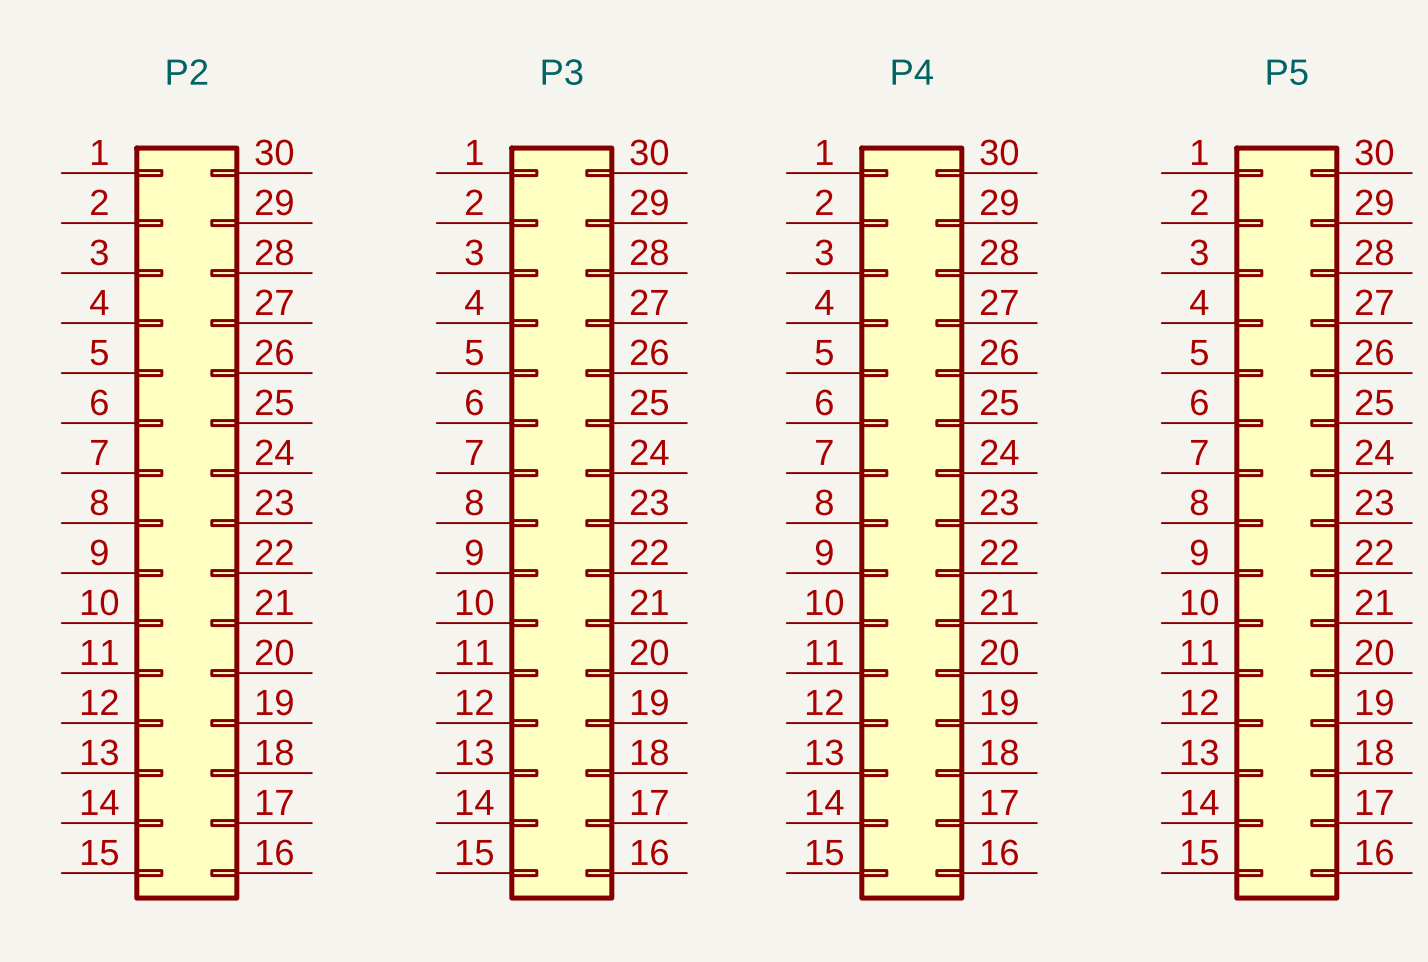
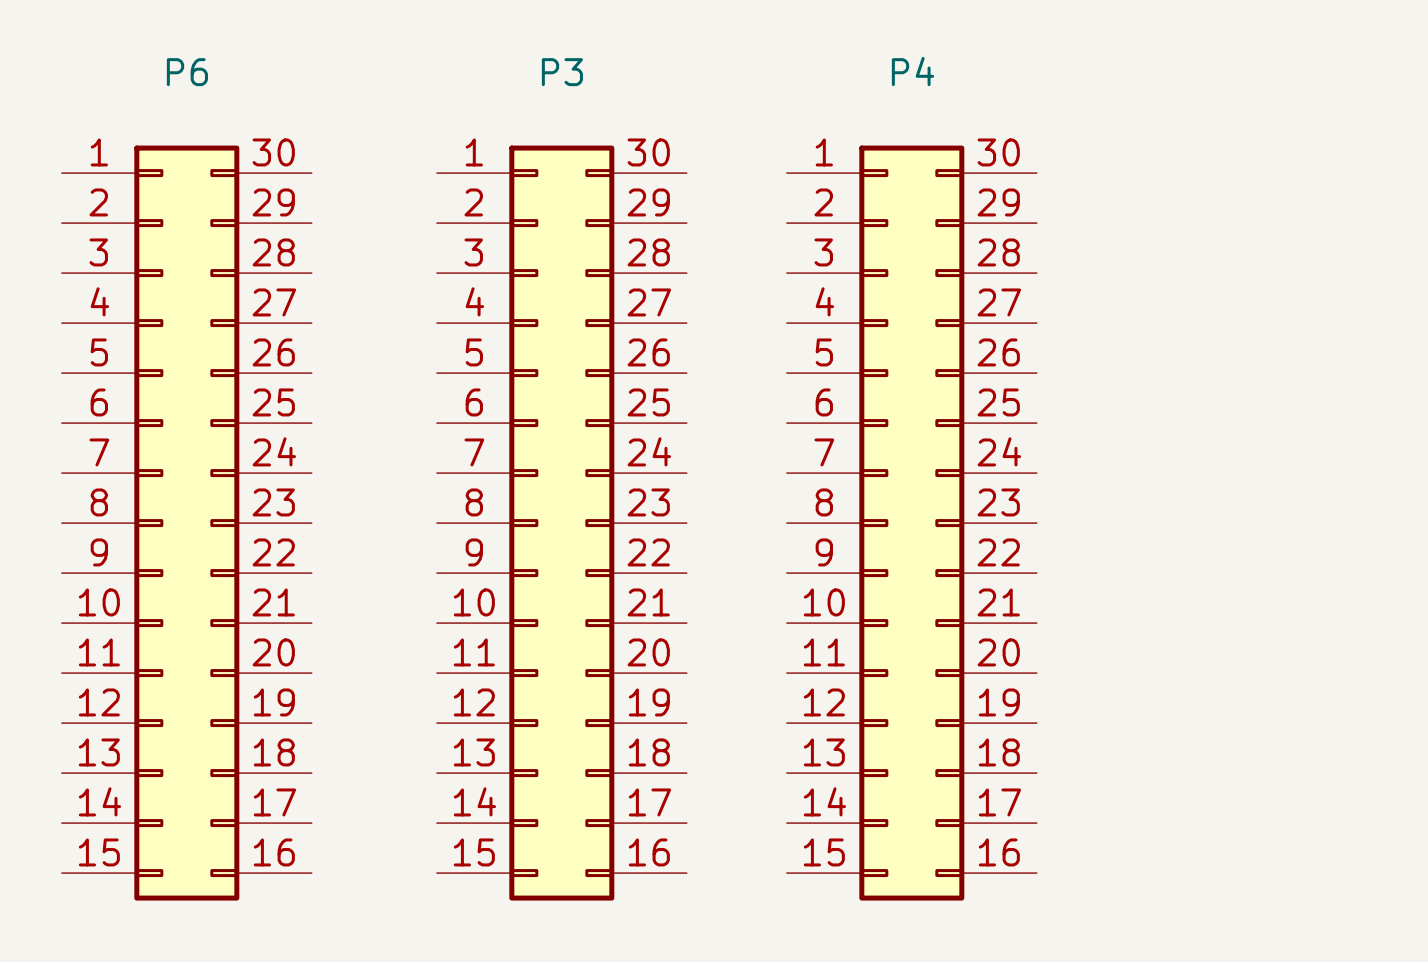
P2 name: P2 (187, 71) -> P6 (187, 72)
P5: (1286, 523) -> none

